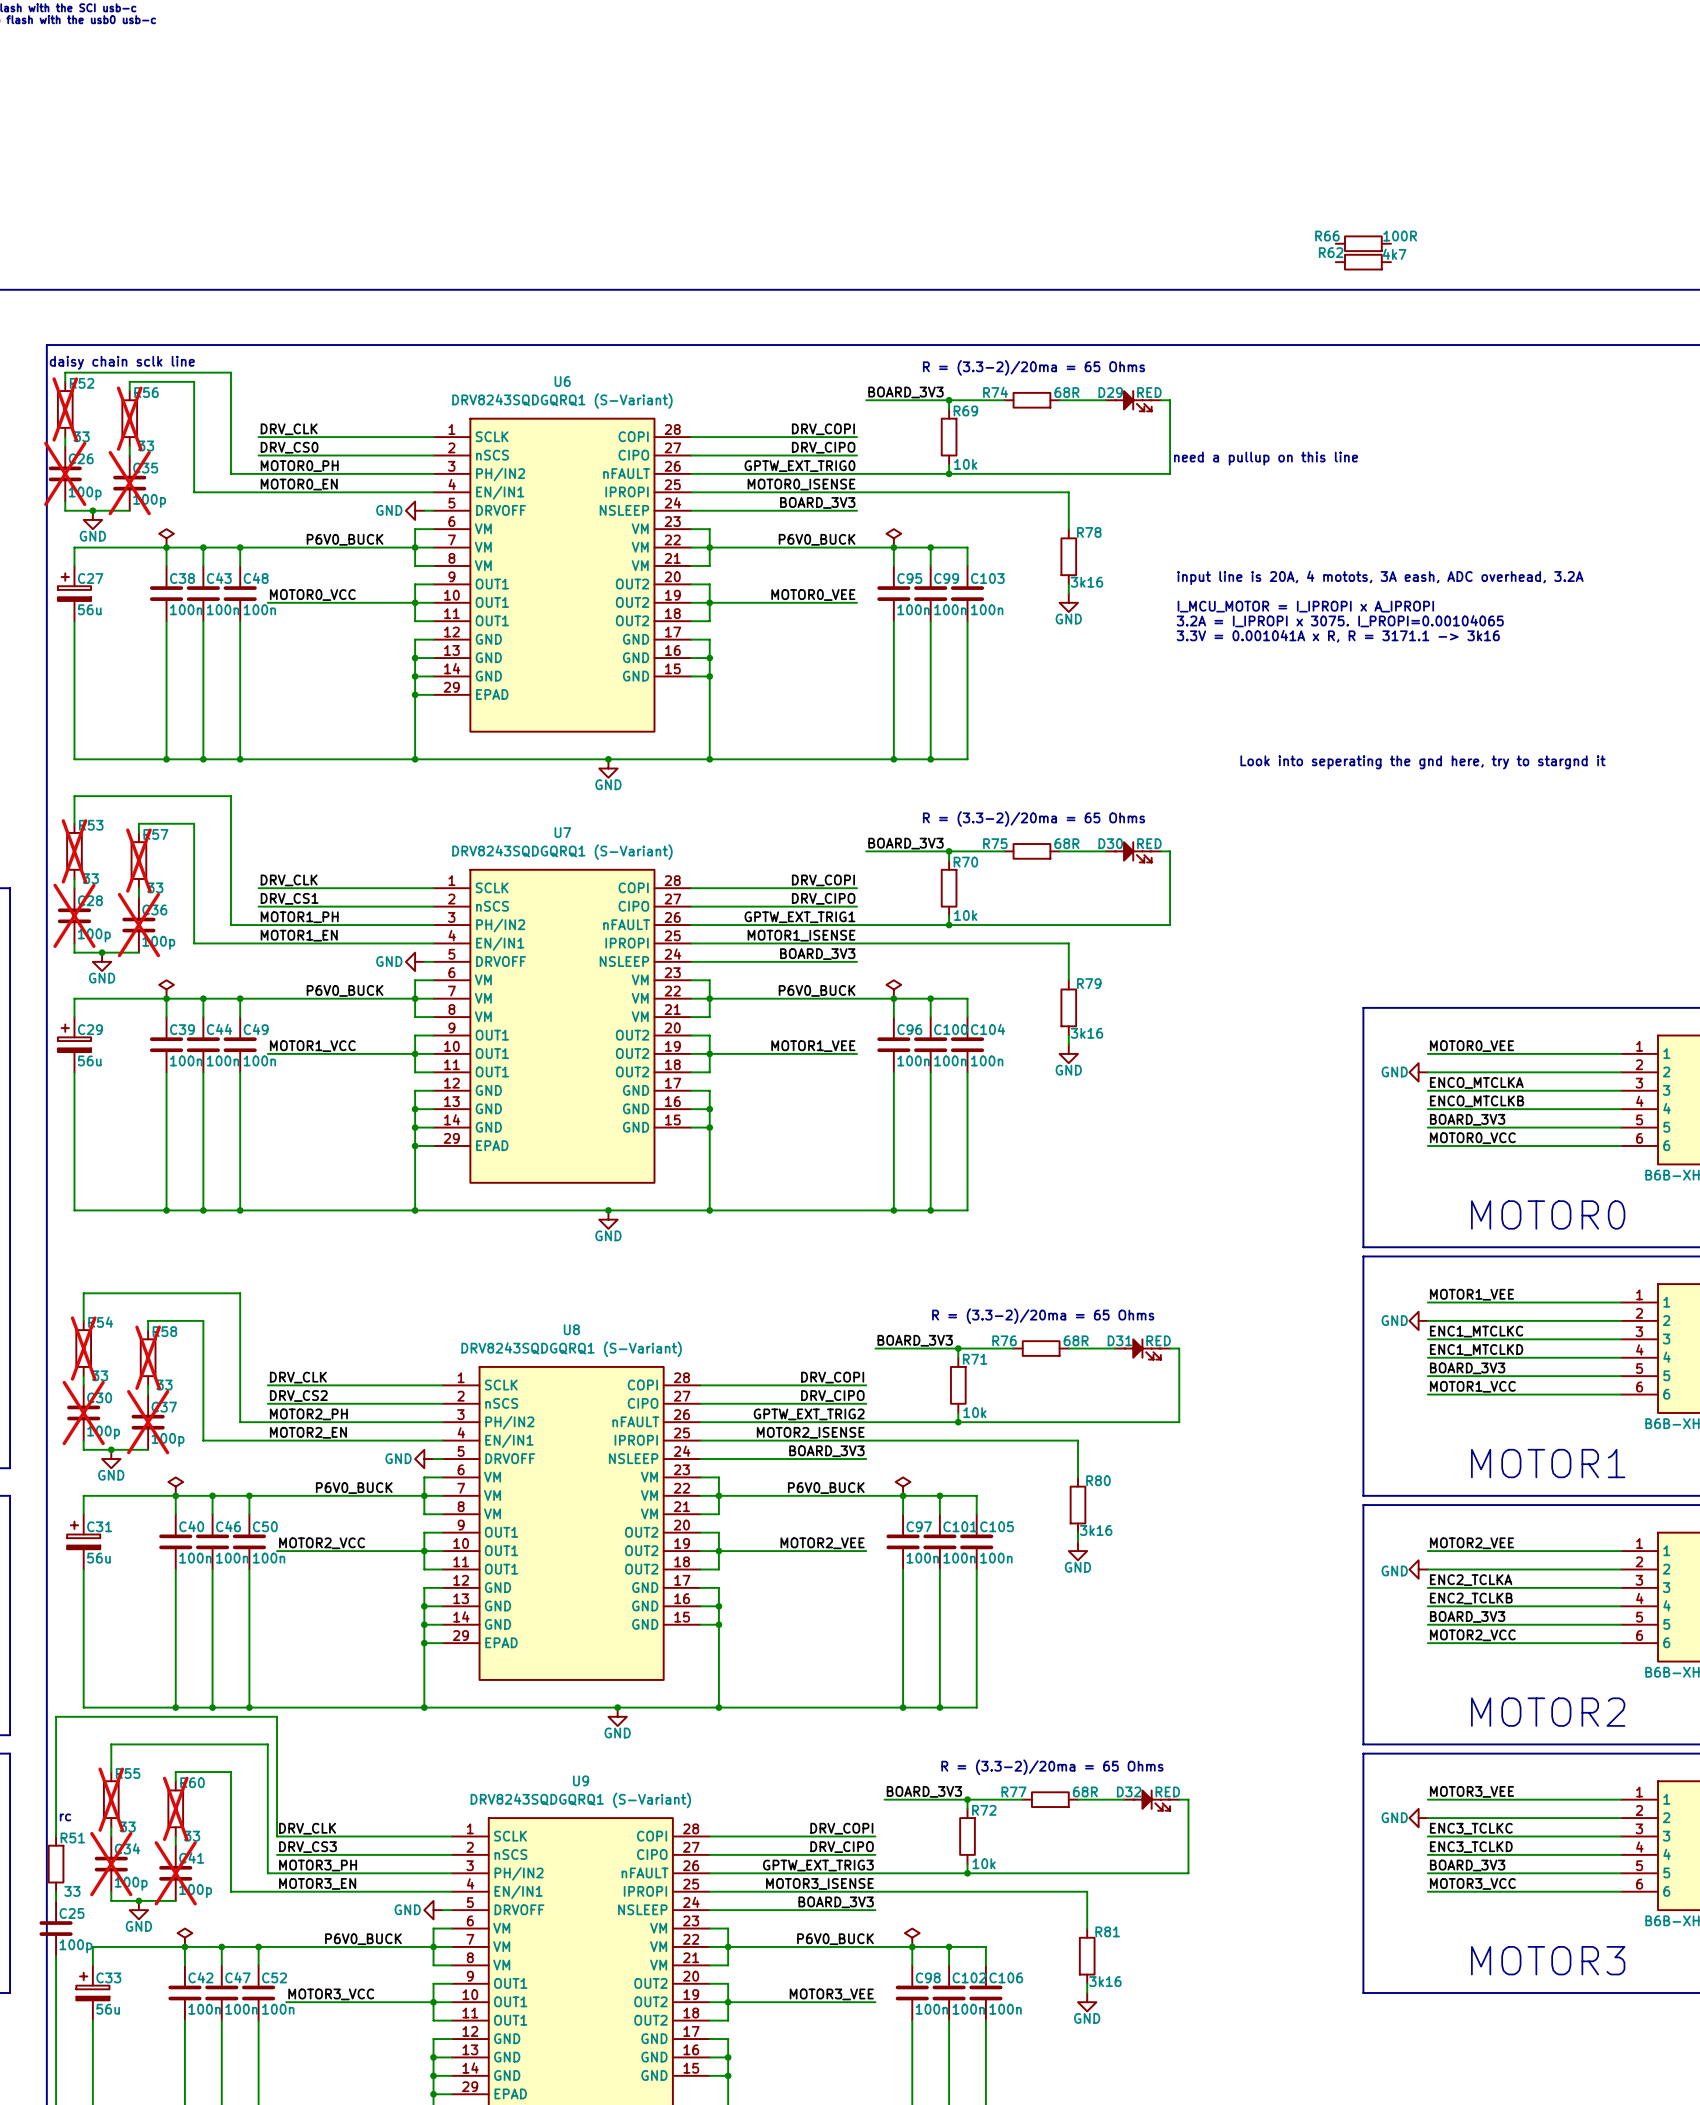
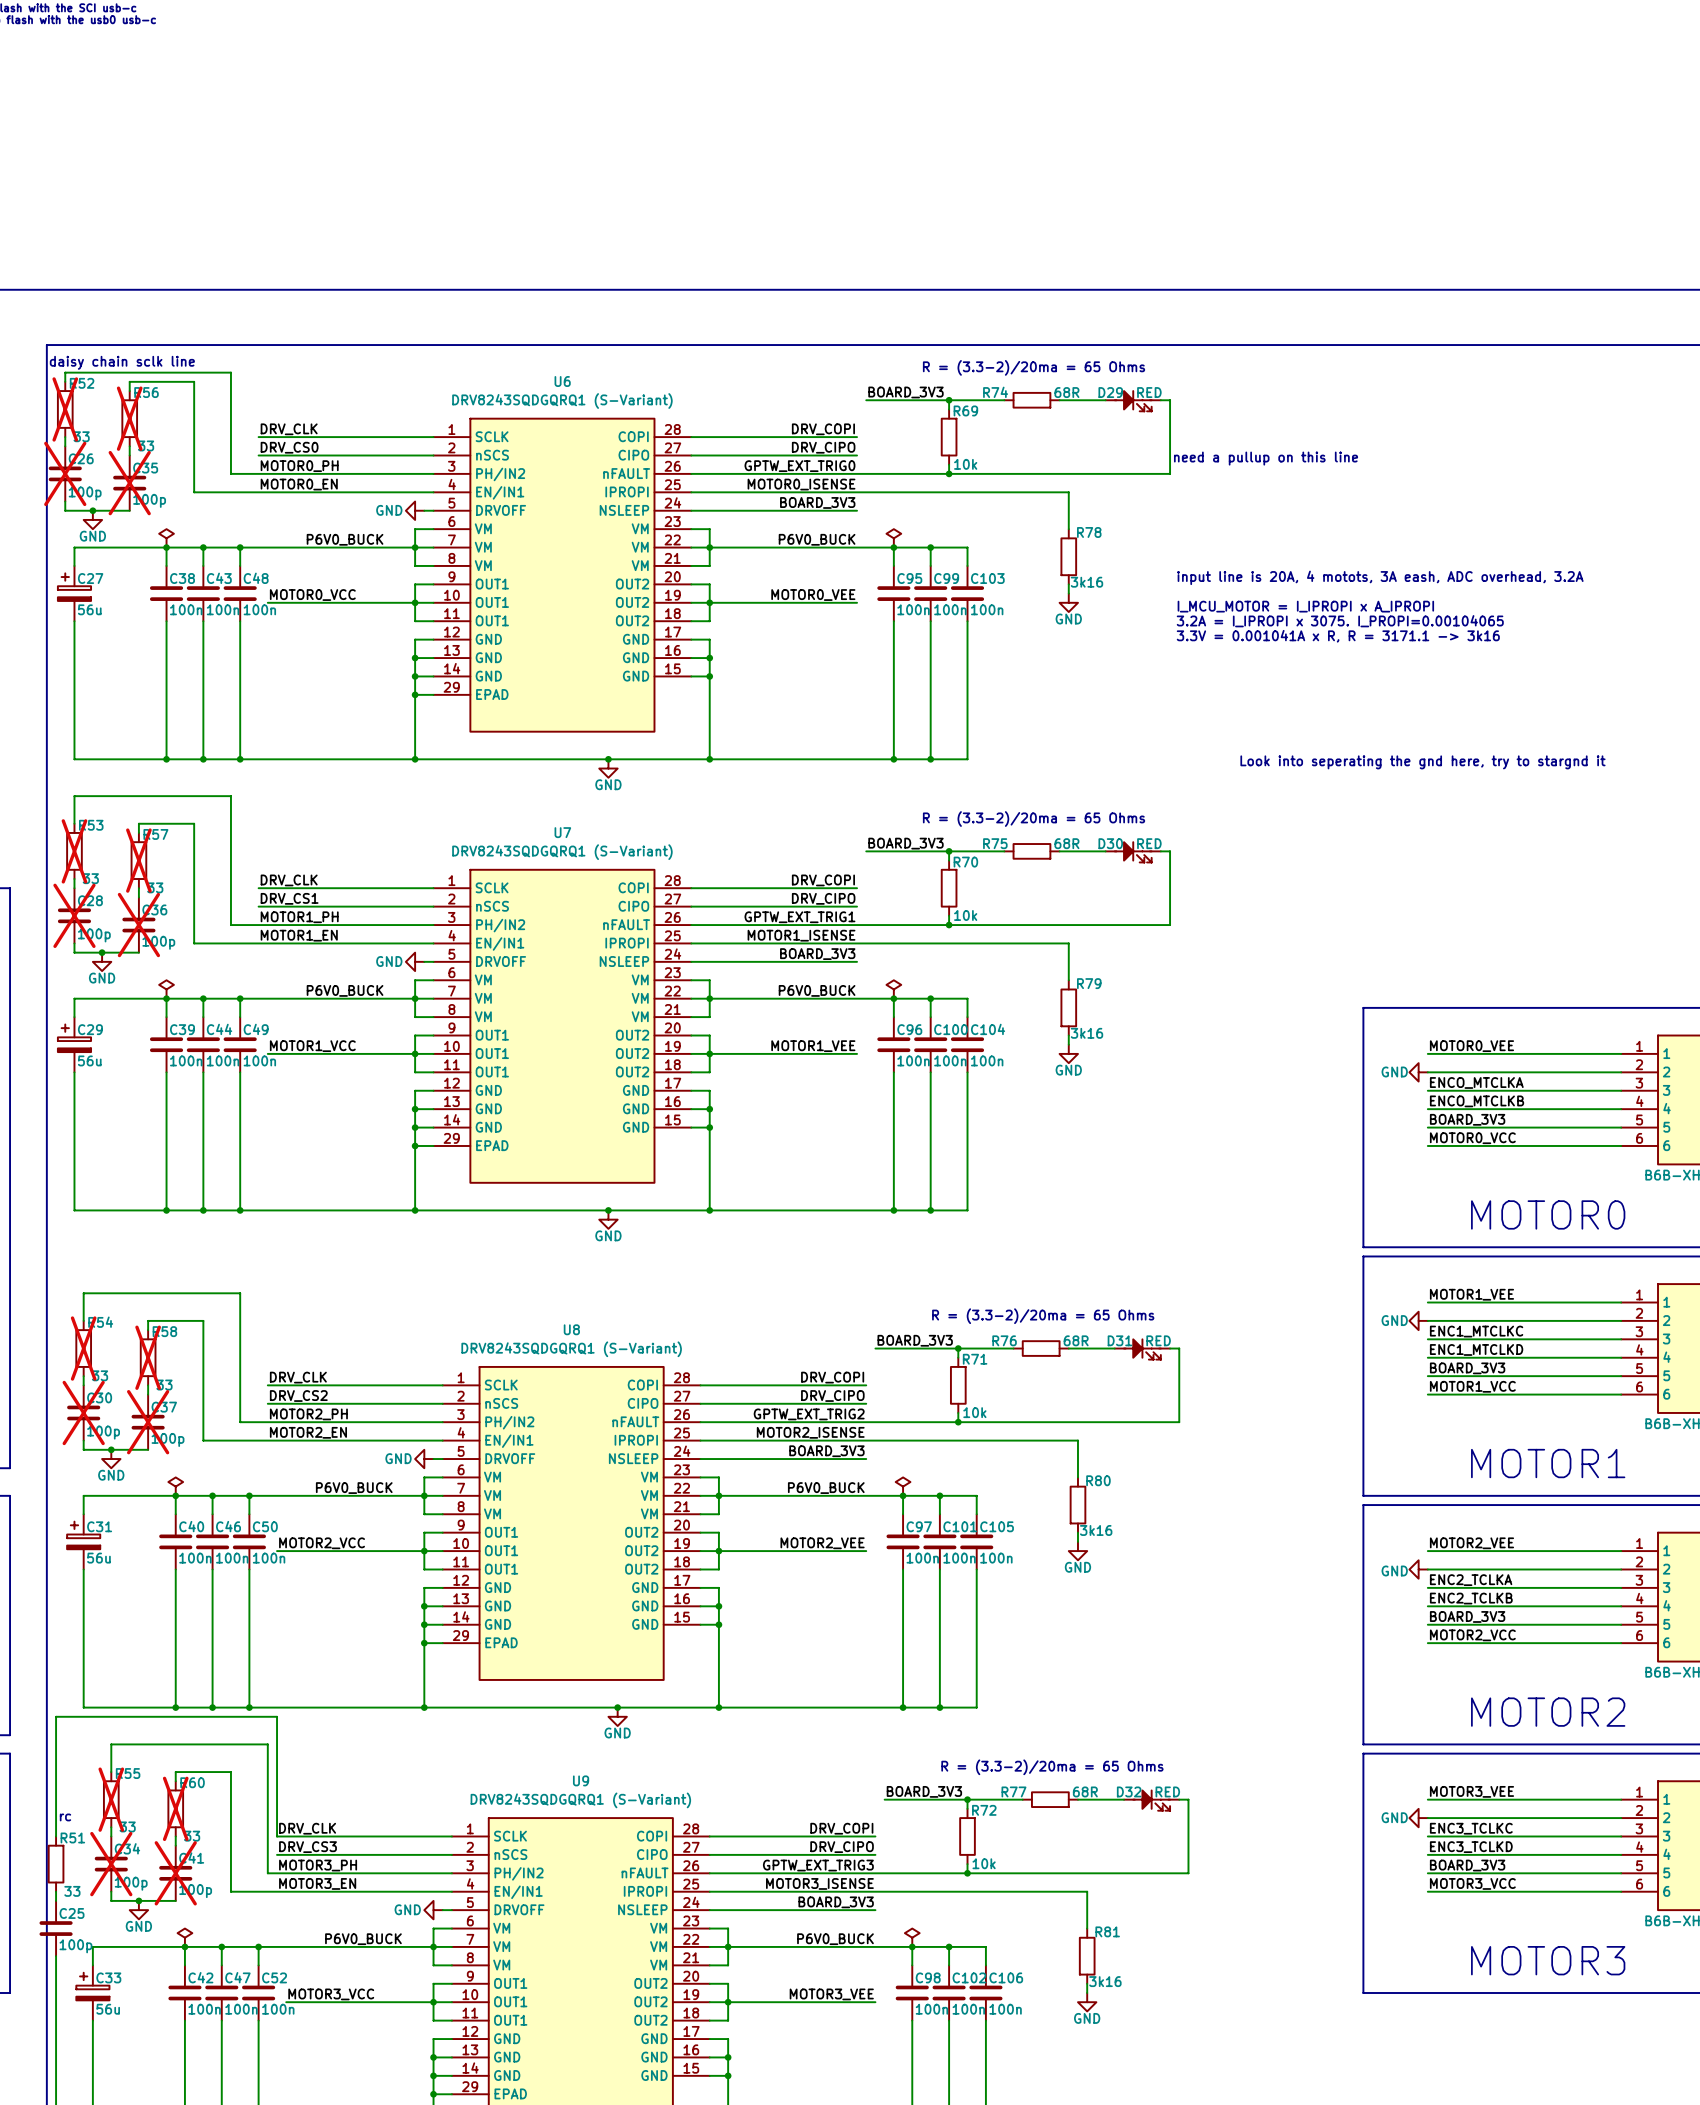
R66: 100R (1363, 243) -> none
R62: 4k7 (1363, 262) -> none

